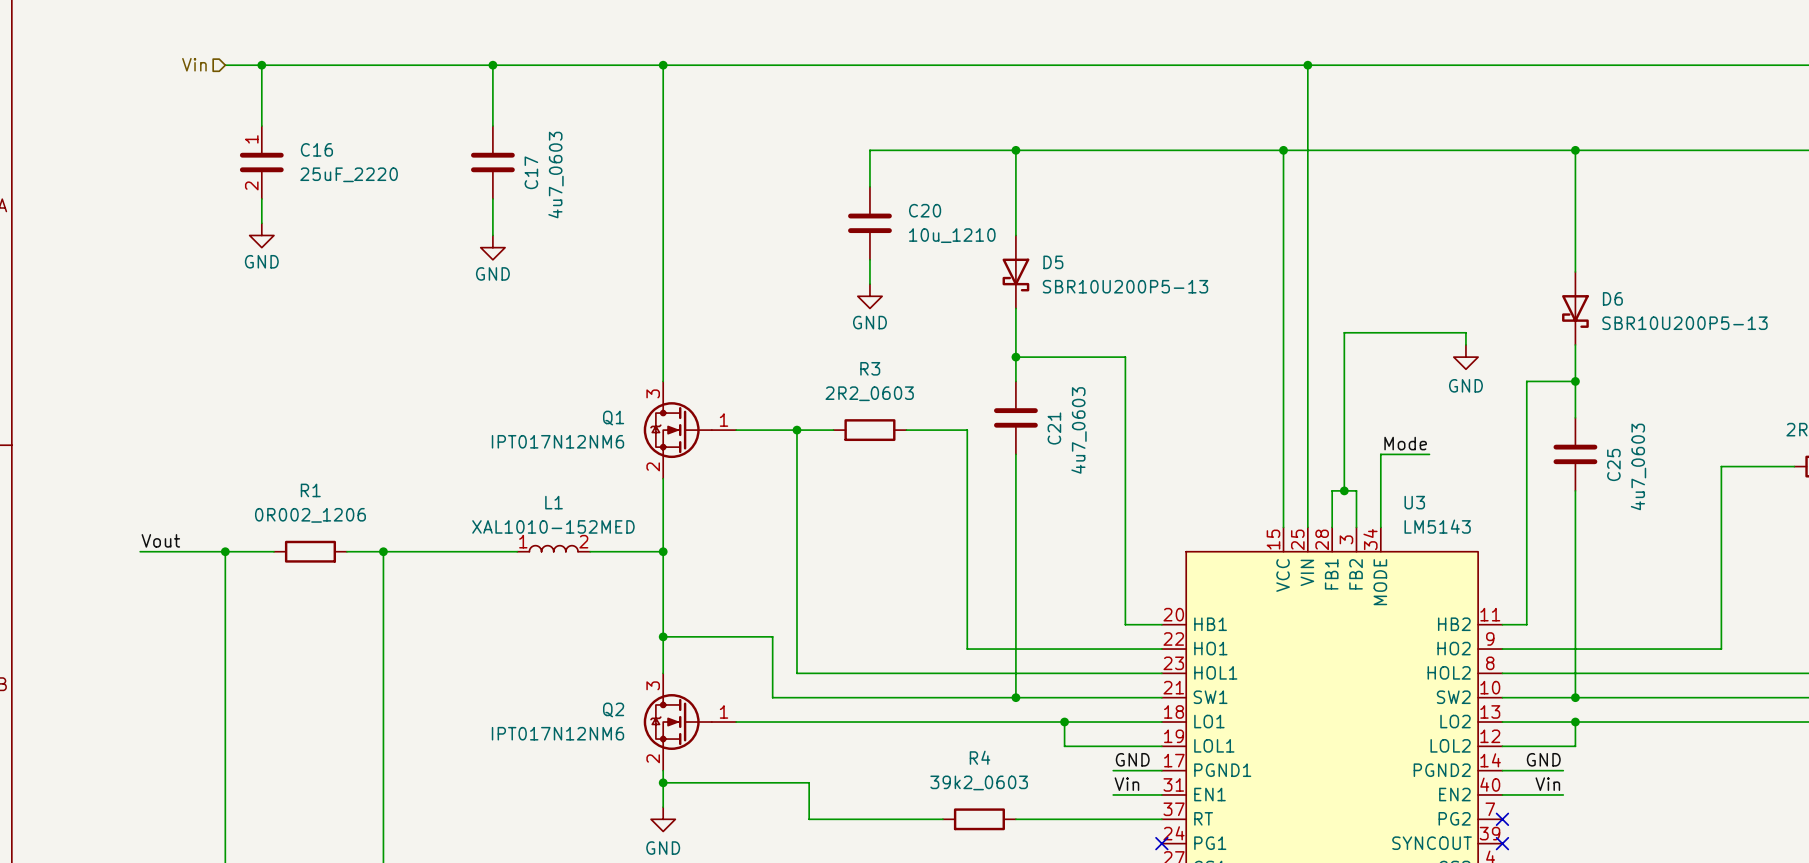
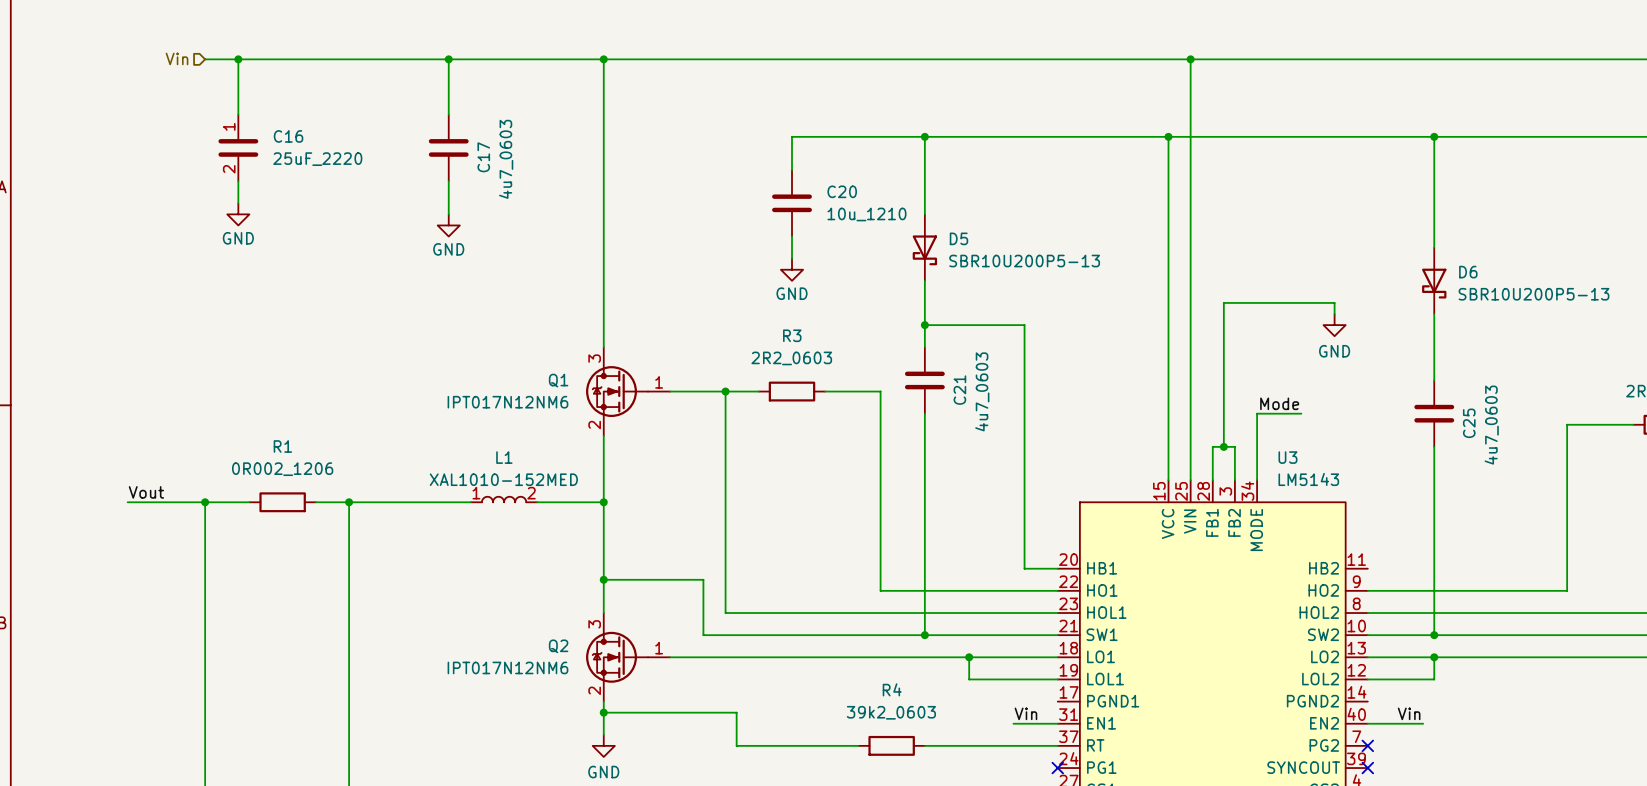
wire: (1575, 381) (1526, 381) (1526, 624) (1502, 624) -> none
junction: (1575, 381) -> none
label: GND (1132, 759) -> none
label: GND (1543, 759) -> none
wire: (1113, 770) (1161, 770) -> none
wire: (1502, 770) (1563, 770) -> none

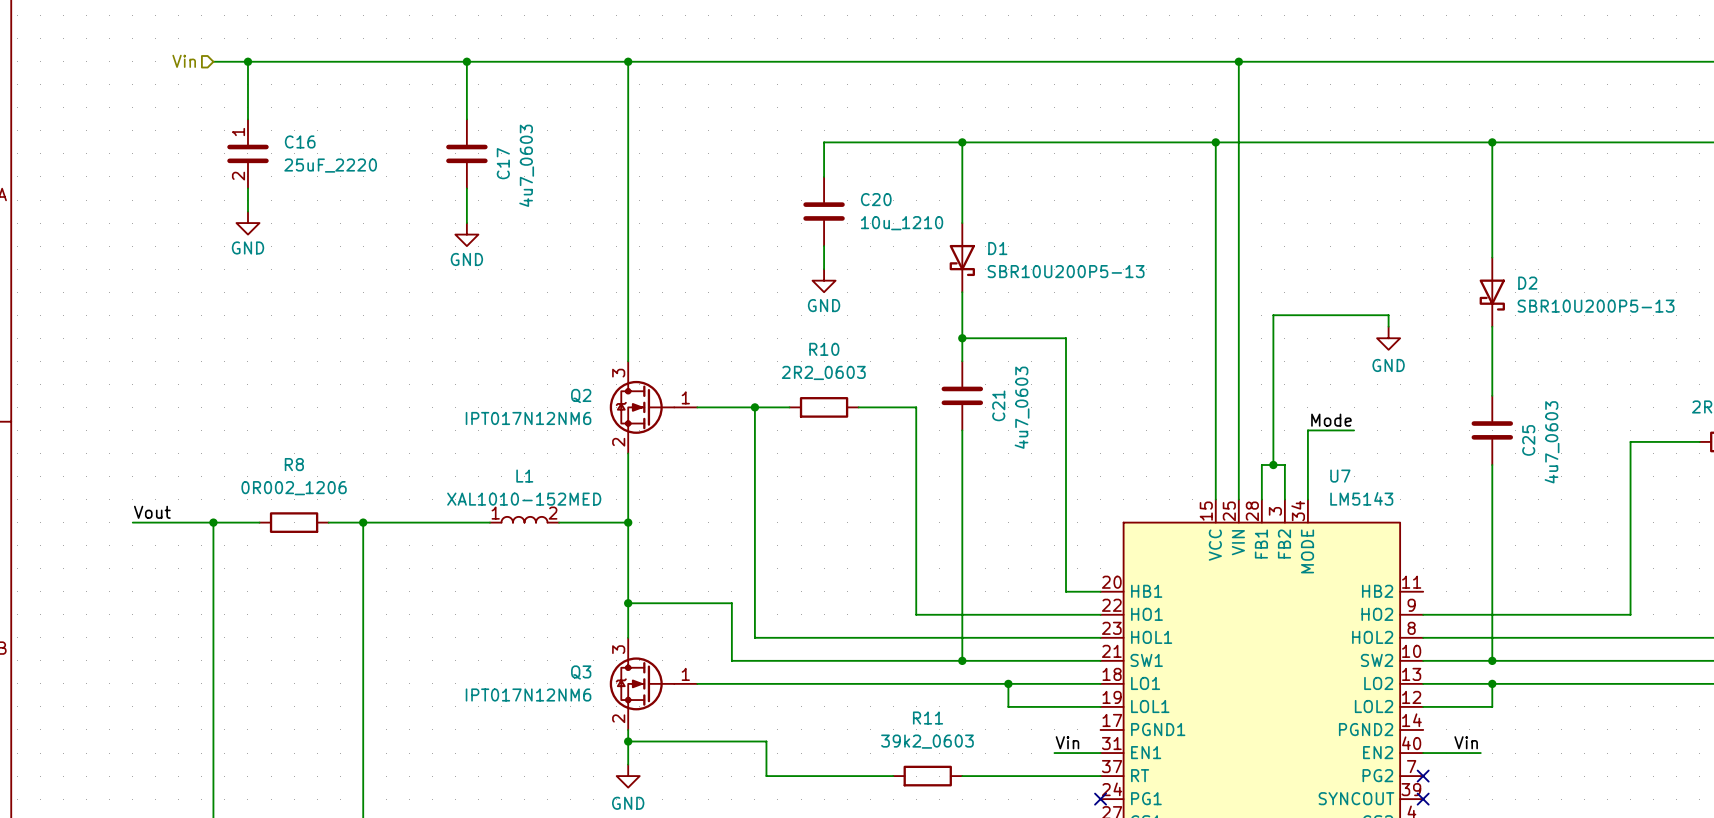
D5 name: D5 (958, 238) -> D1 (997, 248)
D6 name: D6 (1468, 272) -> D2 (1527, 283)
R3 name: R3 (792, 335) -> R10 (824, 349)
Q1 name: Q1 (558, 380) -> Q2 (581, 395)
R1 name: R1 (282, 446) -> R8 (294, 464)
U3 name: U3 (1287, 457) -> U7 (1340, 476)
Q2 name: Q2 (558, 646) -> Q3 (581, 672)
R4 name: R4 (892, 689) -> R11 (928, 718)

